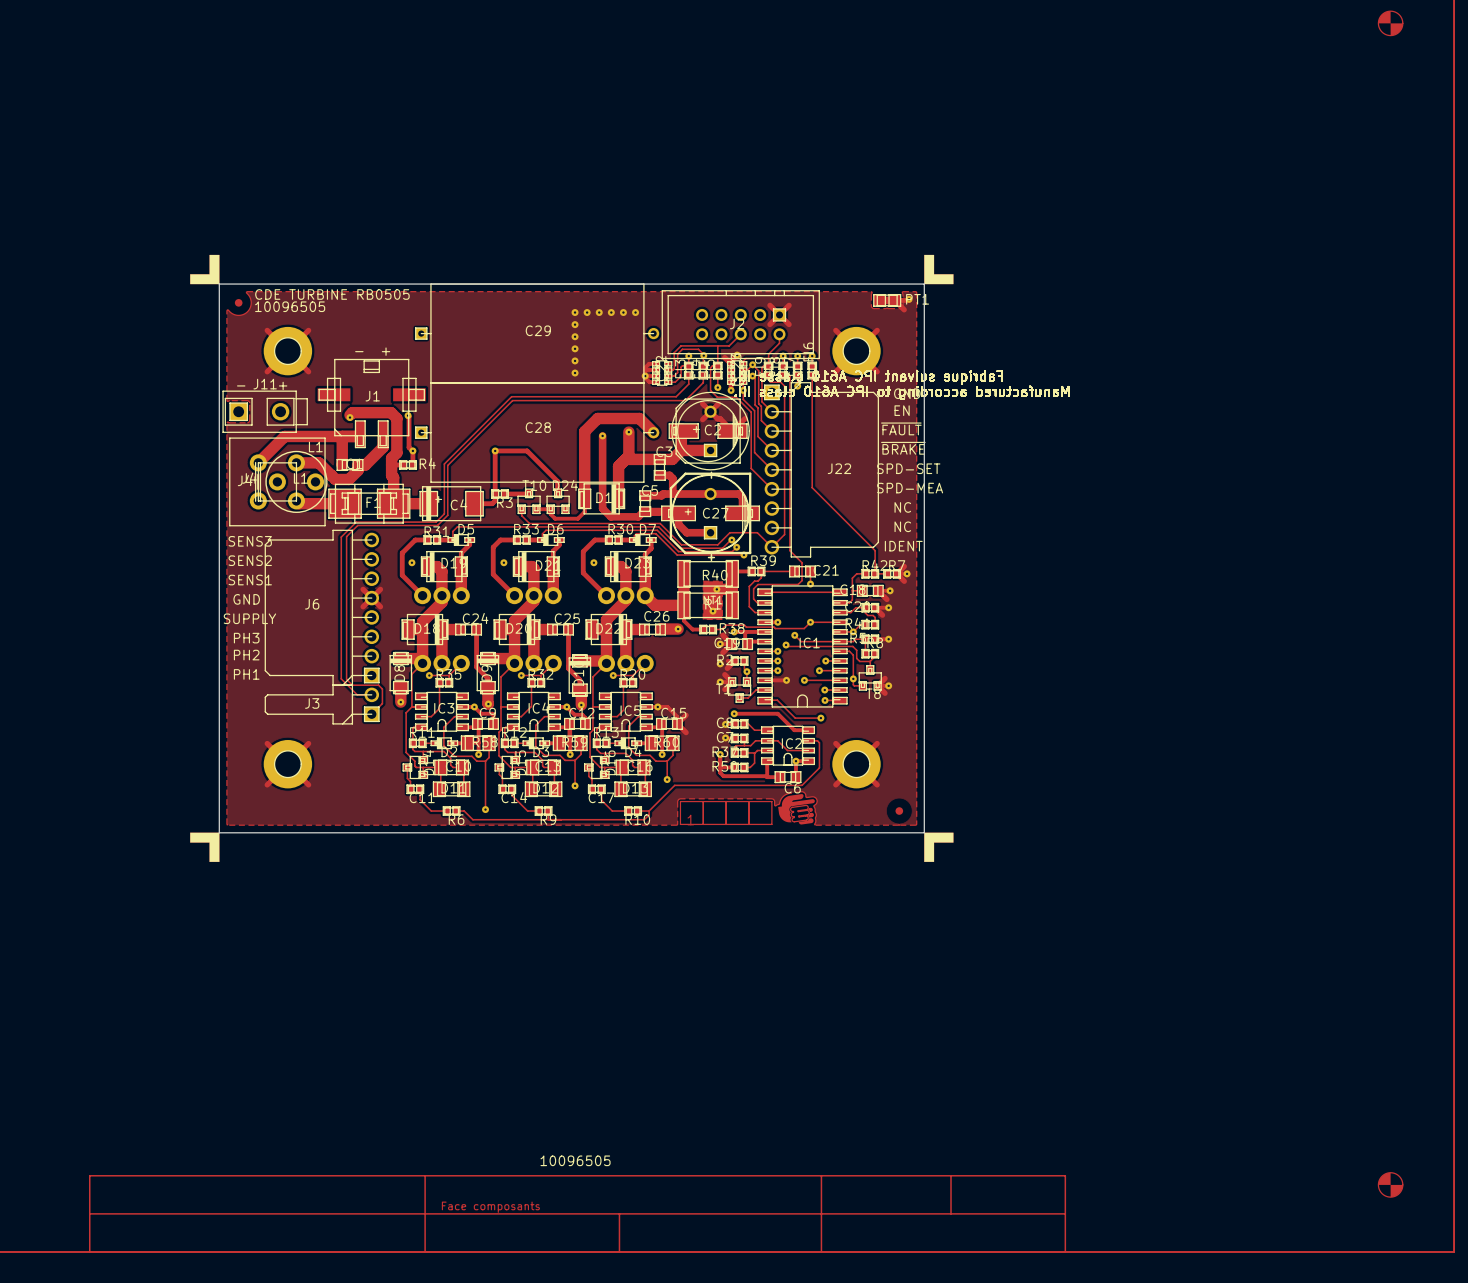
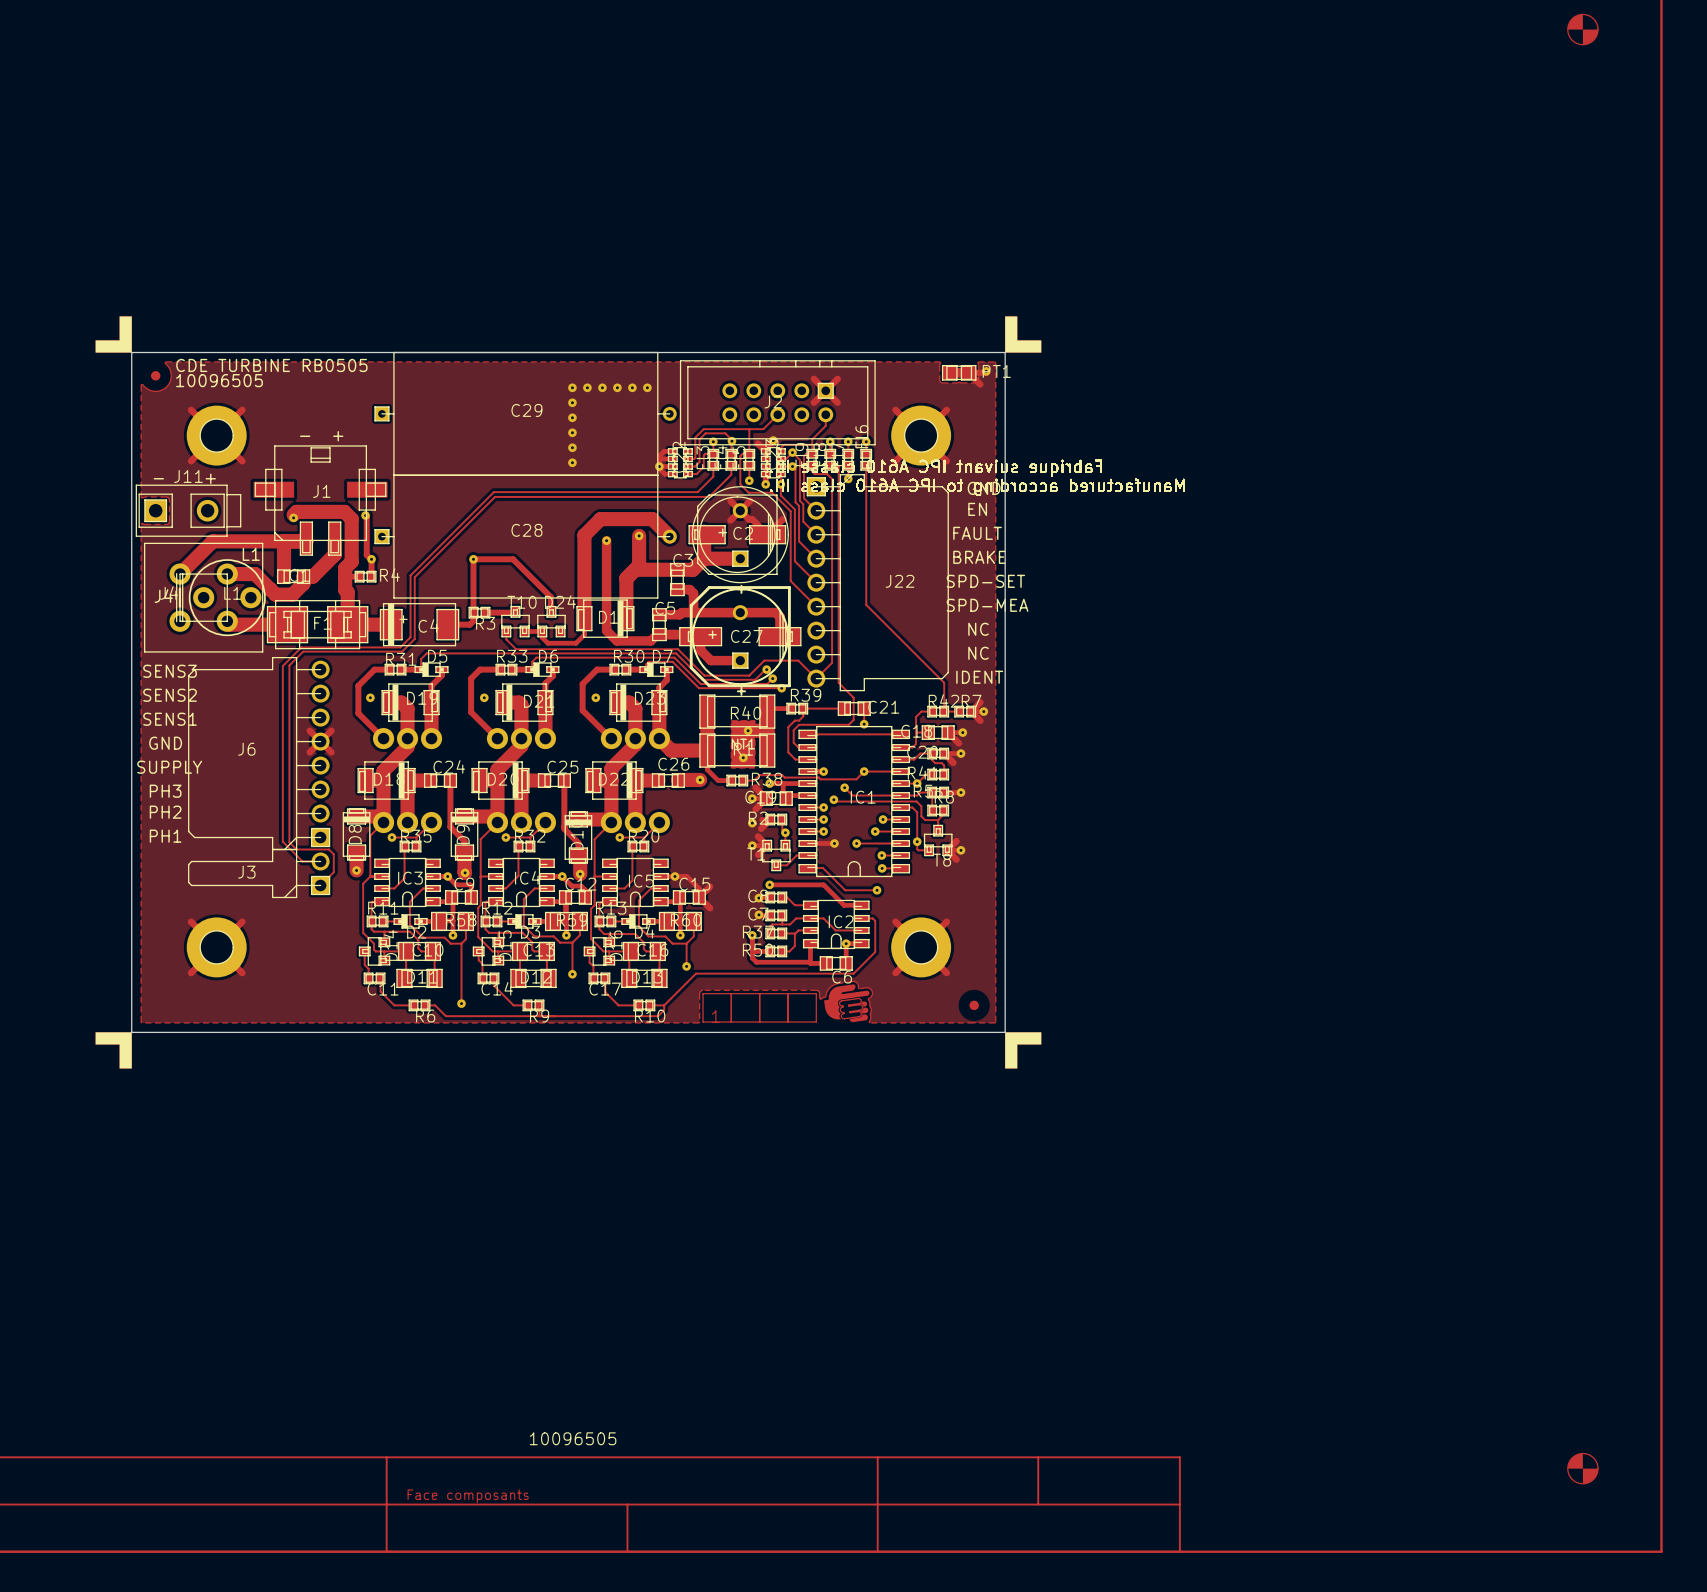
text: ~{FAULT} (901, 428) -> FAULT (977, 533)
text: ~{BRAKE} (903, 448) -> BRAKE (979, 557)

